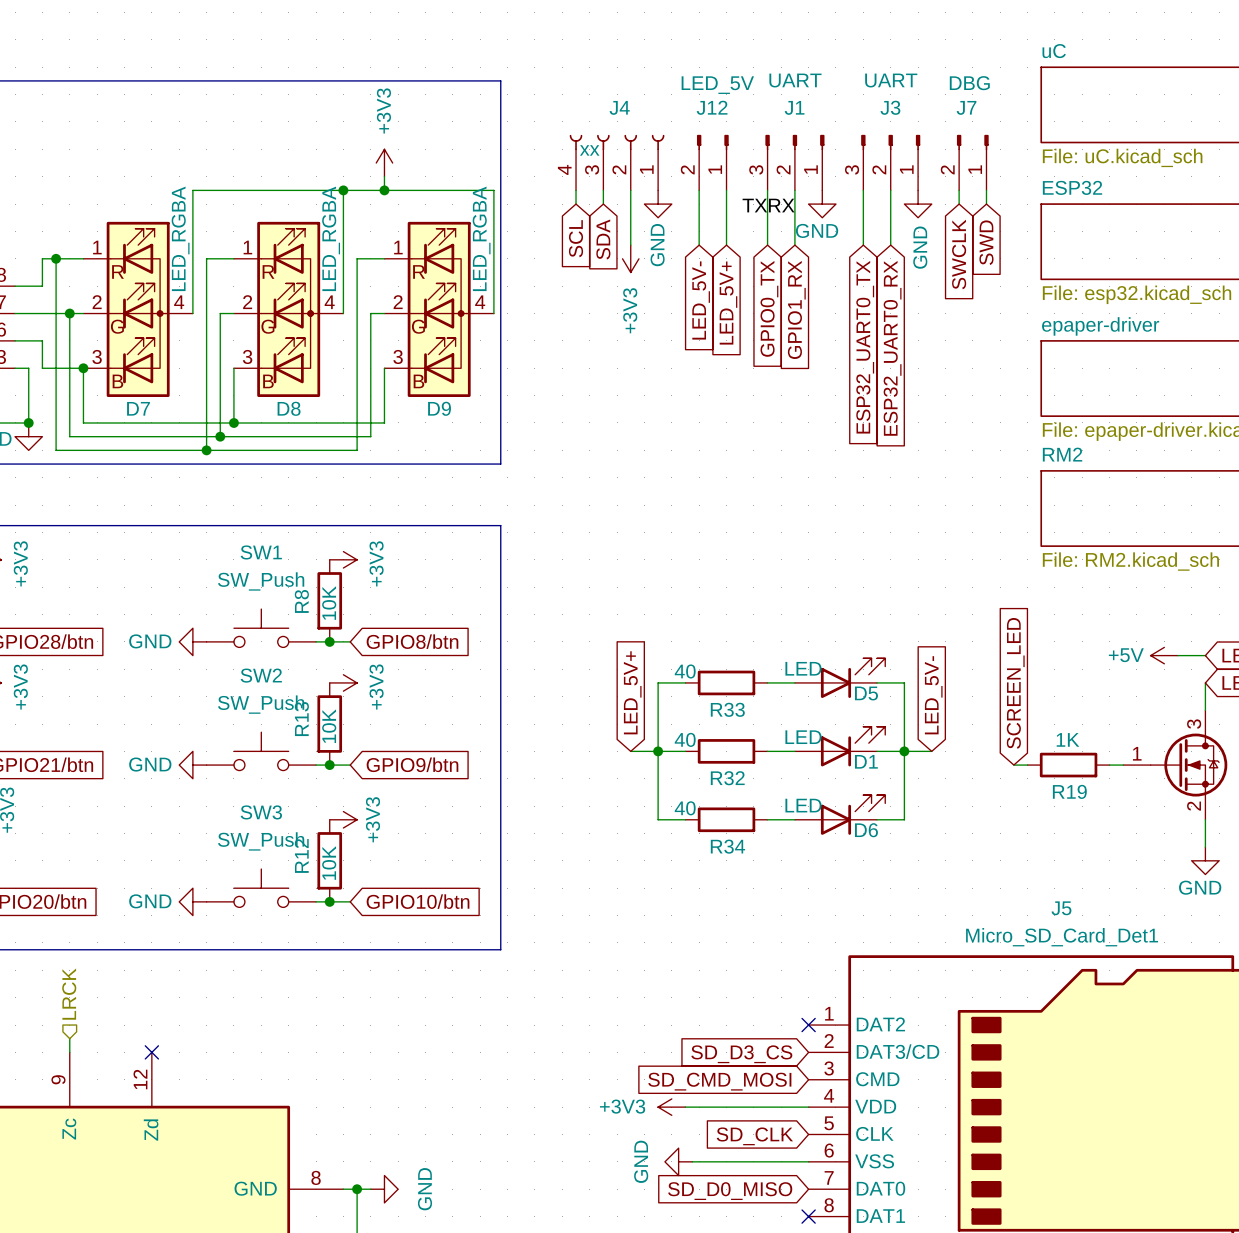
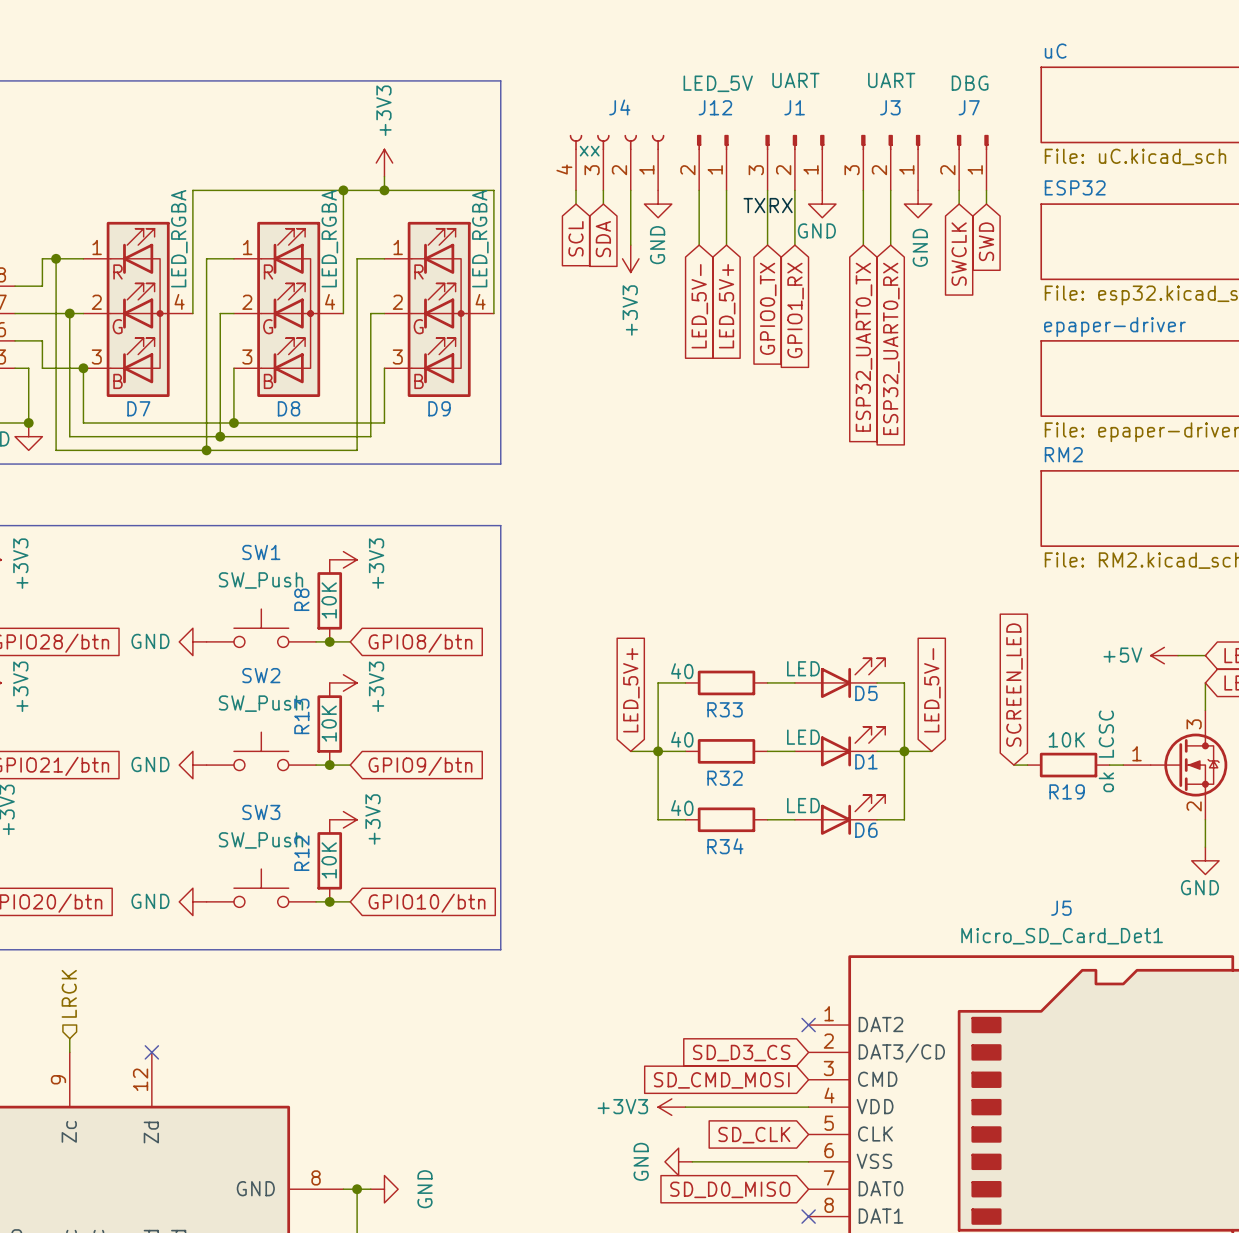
R19 value: 1K (1068, 739) -> 10K (1066, 739)
R19 text: none -> ok LCSC (1106, 751)

